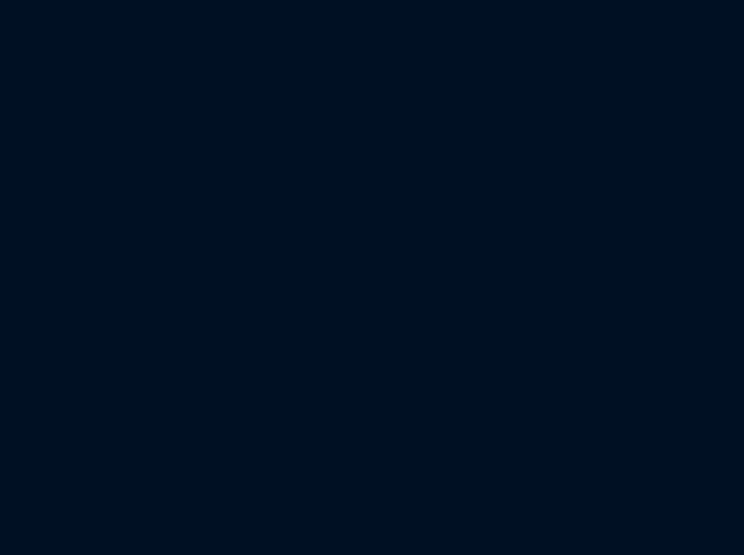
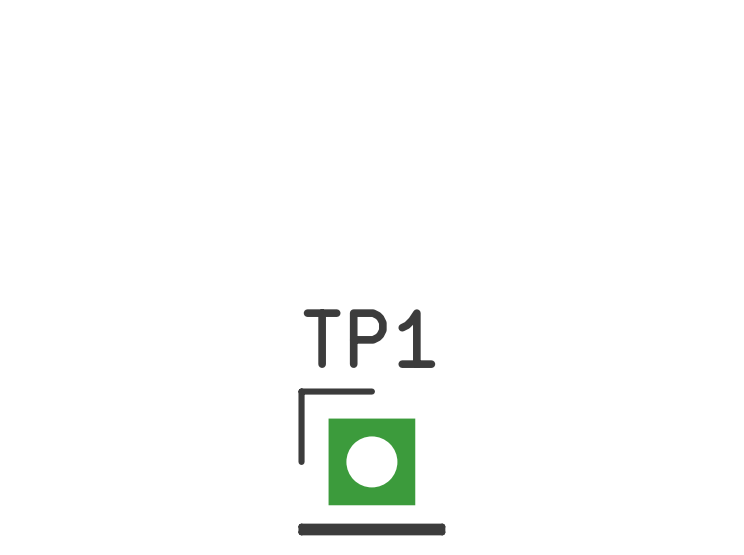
TP1: none -> (371, 461)

